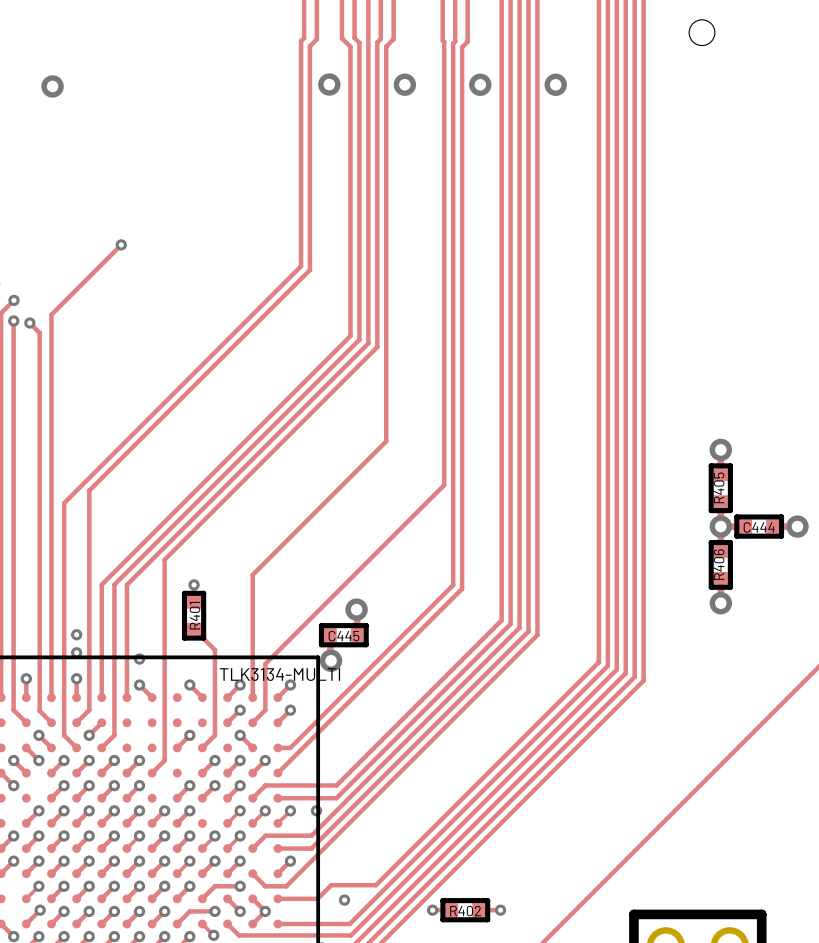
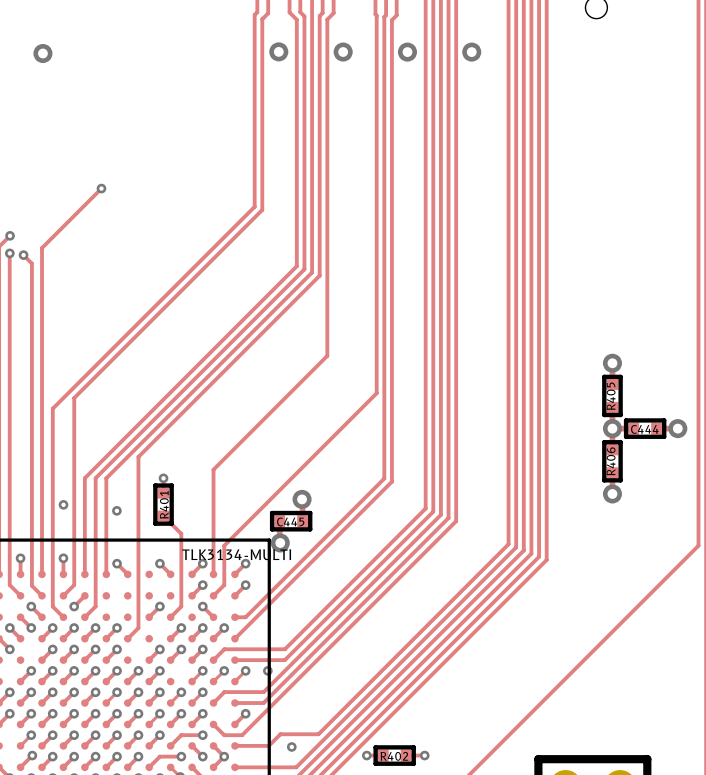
via: none -> (63, 504)
via: none -> (116, 510)
via: (76, 634) -> none
via: (76, 652) -> none
via: (139, 659) -> none

